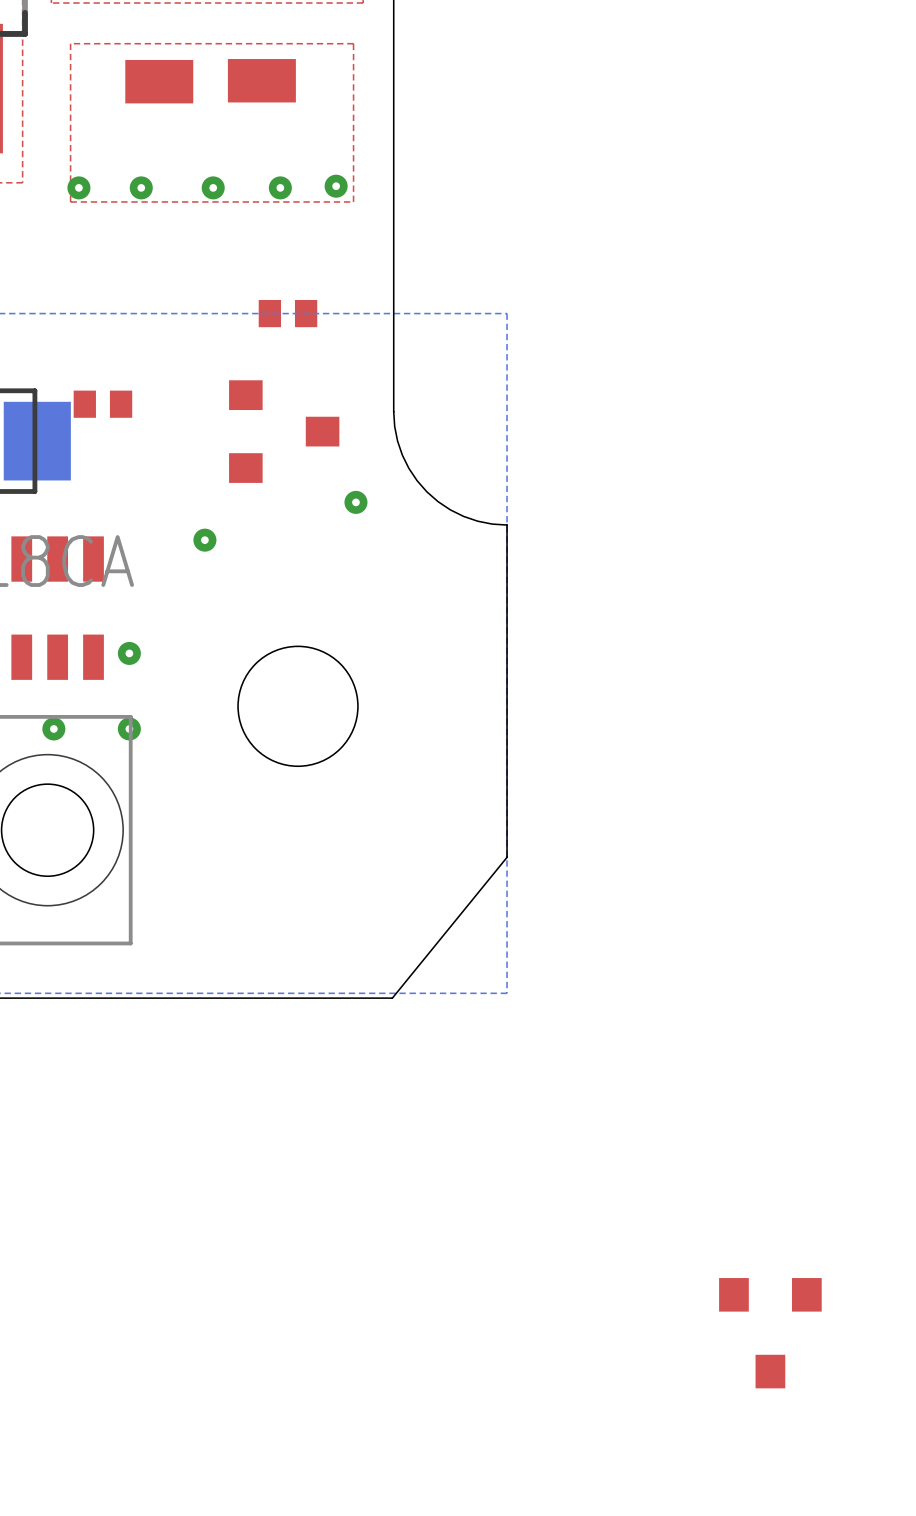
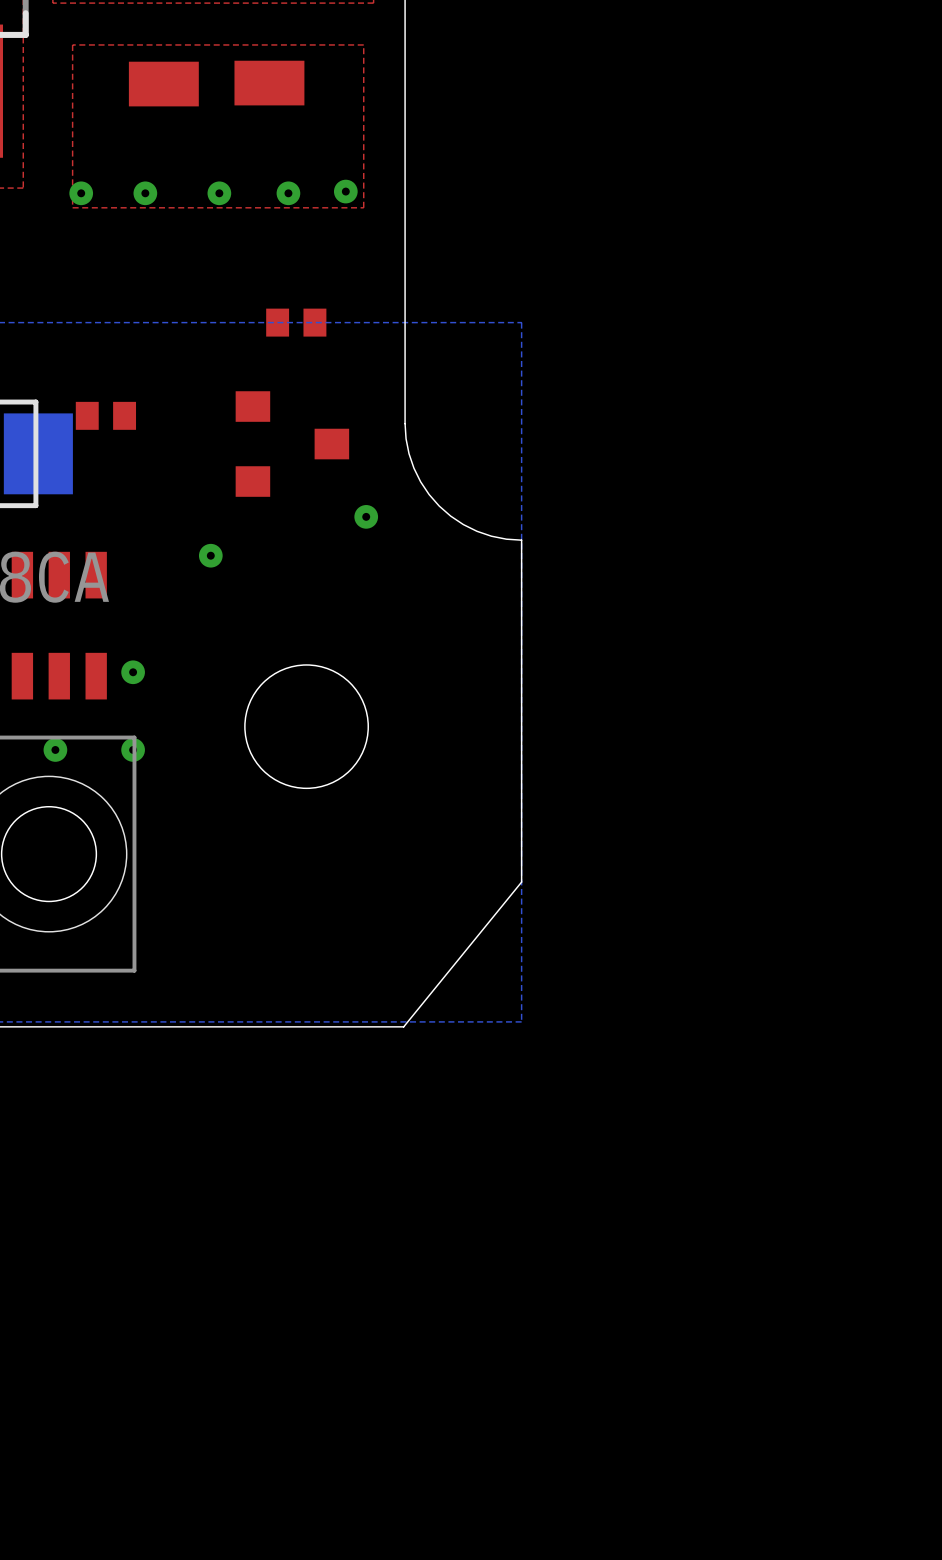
part: (770, 1333) -> none

